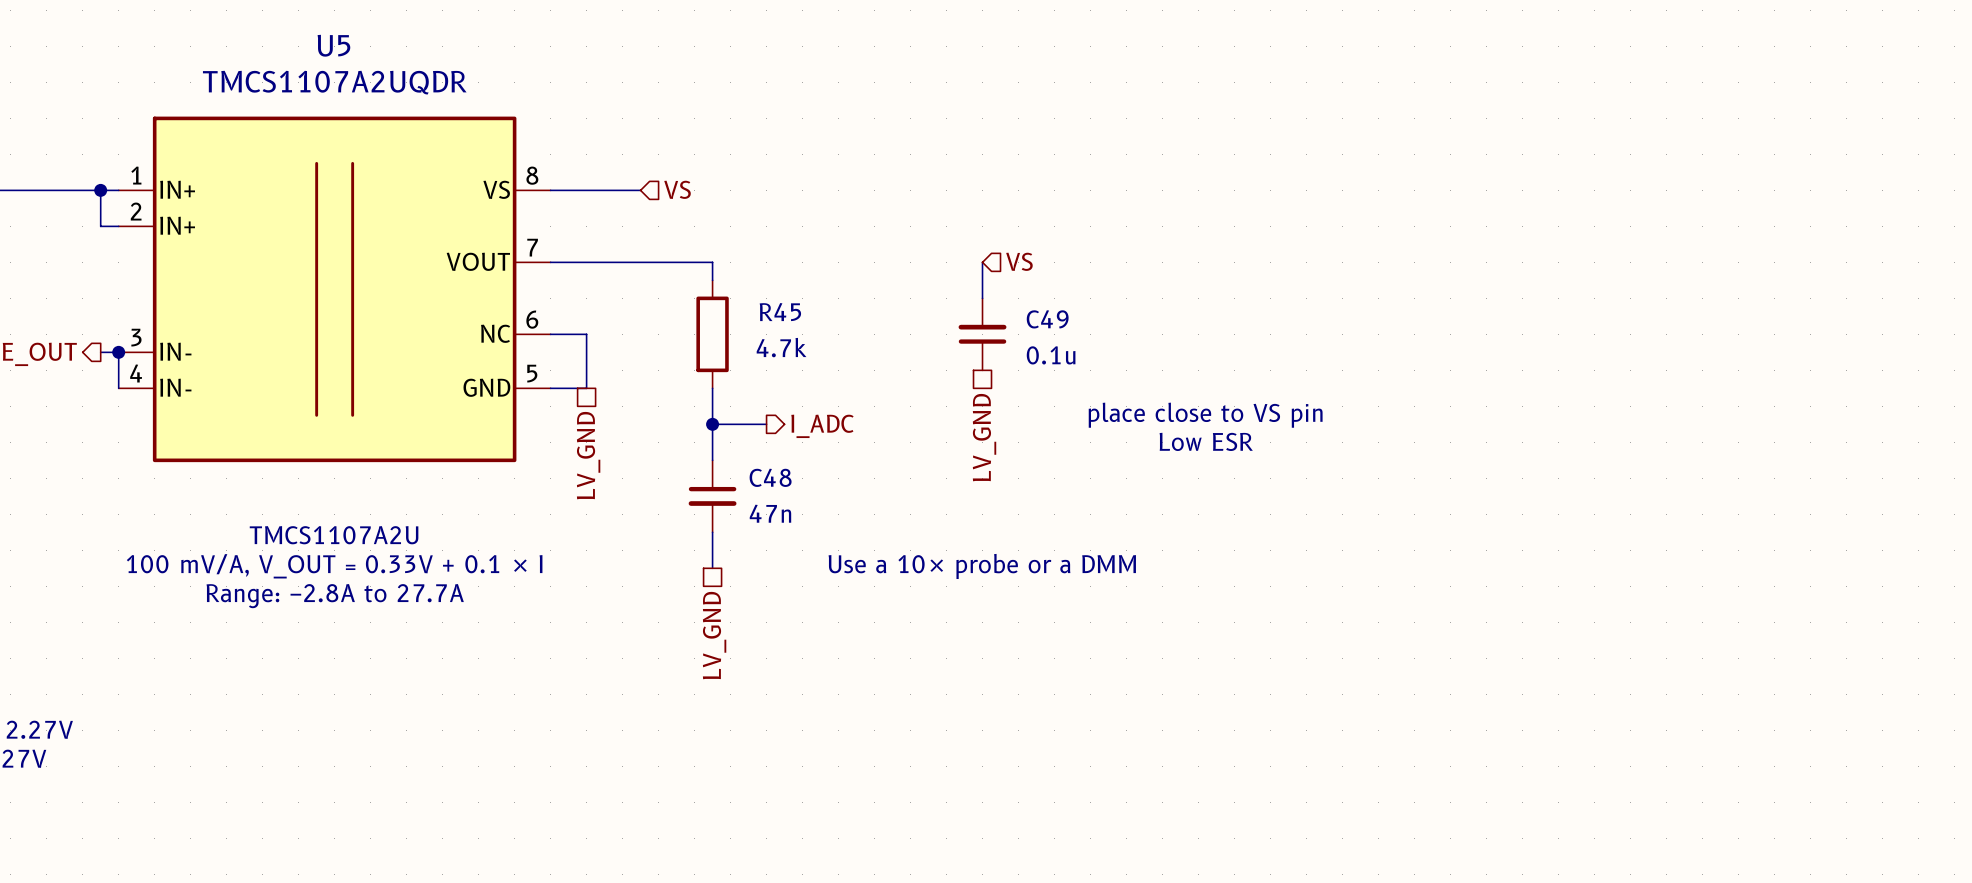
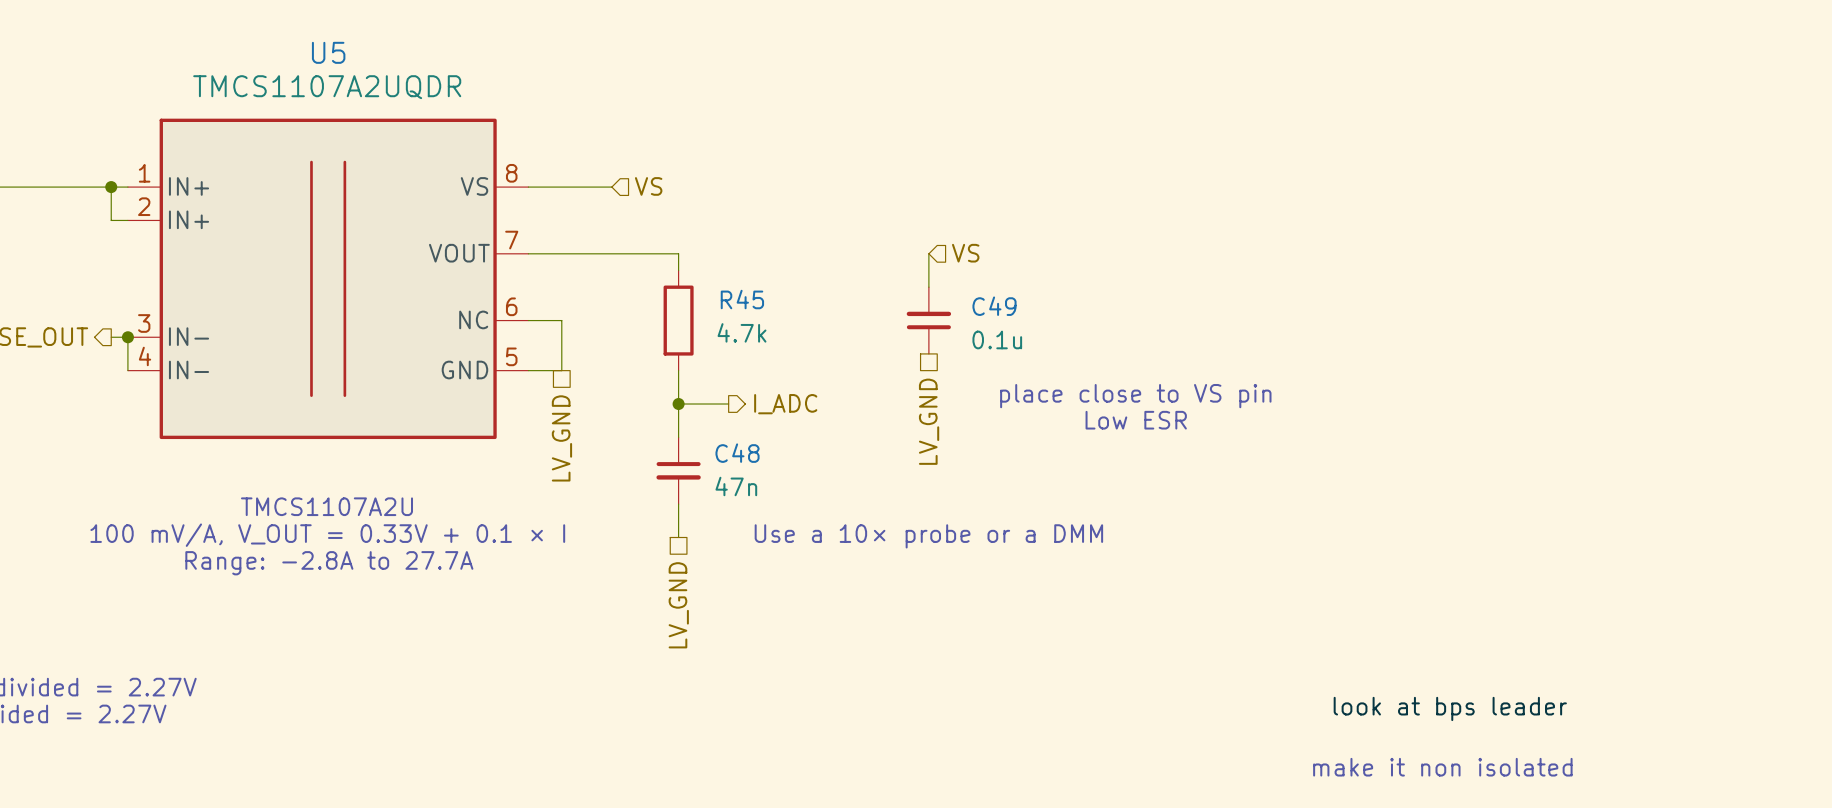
label: none -> look at bps leader (1450, 708)
text: none -> make it non isolated (1442, 767)

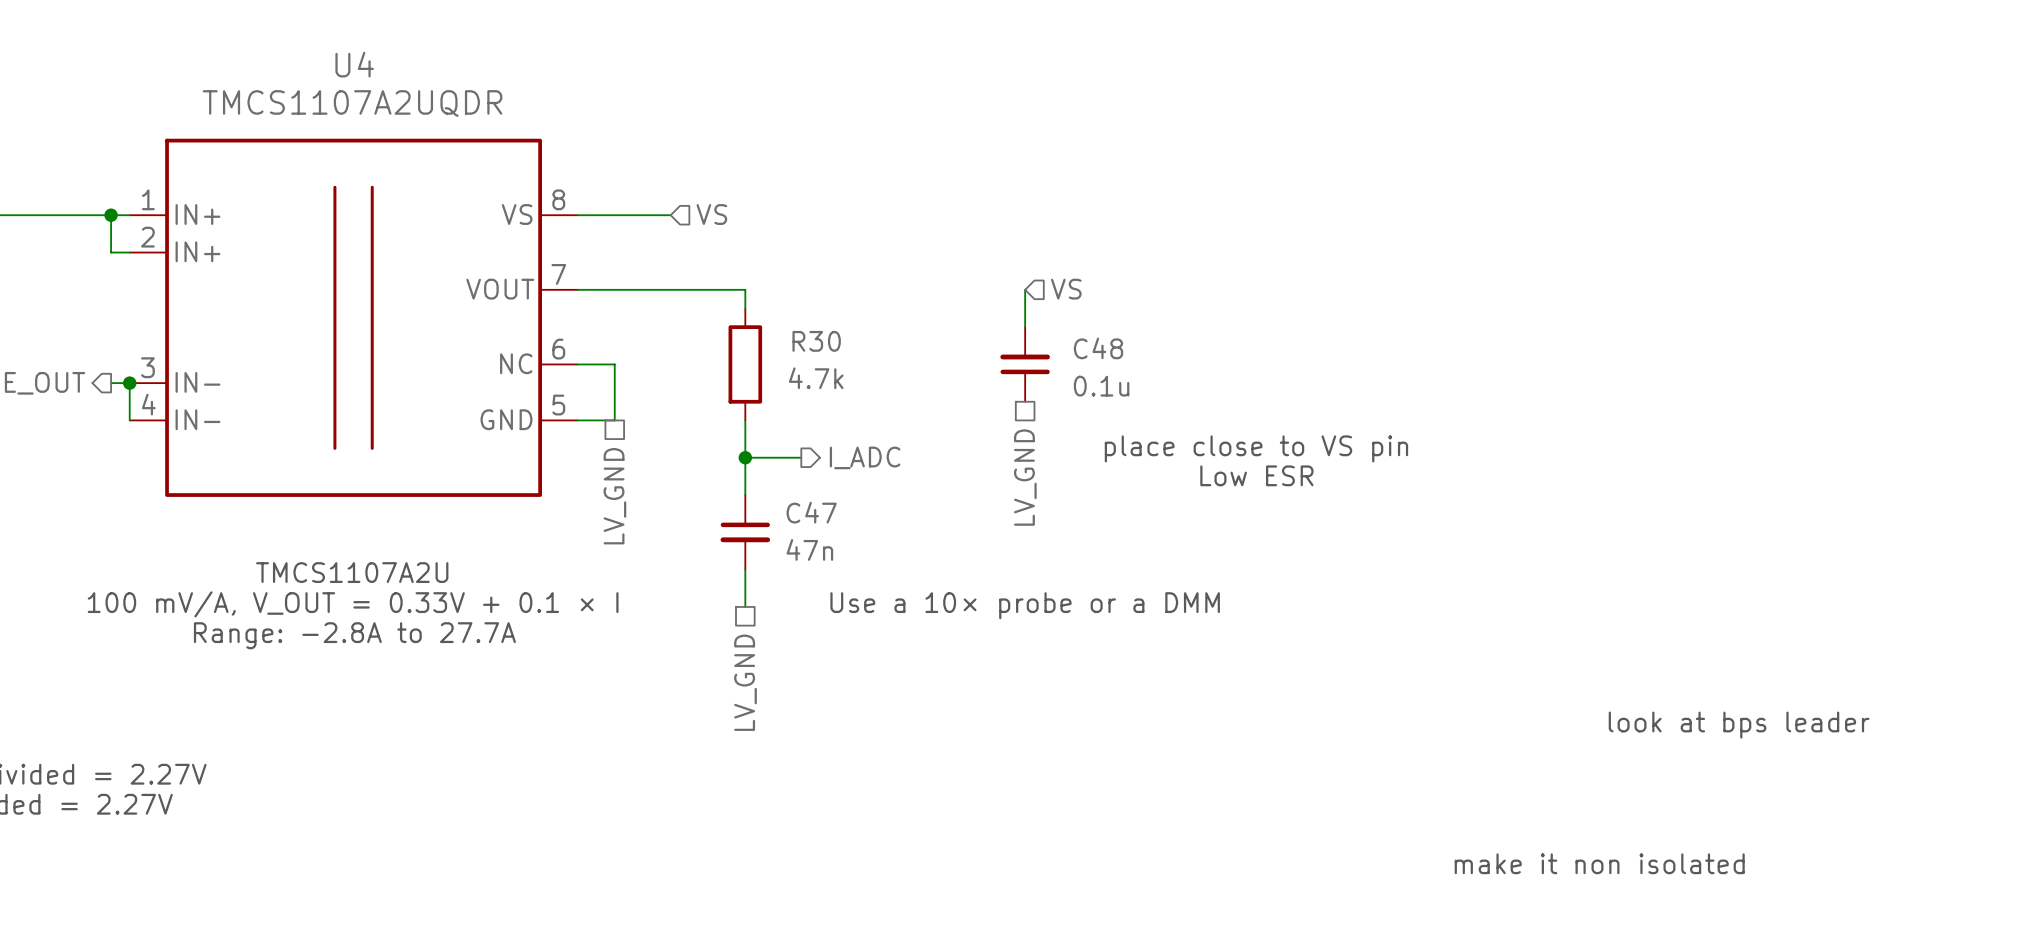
U5 name: U5 (328, 52) -> U4 (354, 64)
R45 name: R45 (742, 299) -> R30 (816, 341)
C49 name: C49 (994, 306) -> C48 (1098, 348)
C48 name: C48 (737, 453) -> C47 (811, 512)
text: none -> look at bps leader (1739, 725)
label: look at bps leader (1450, 708) -> none

